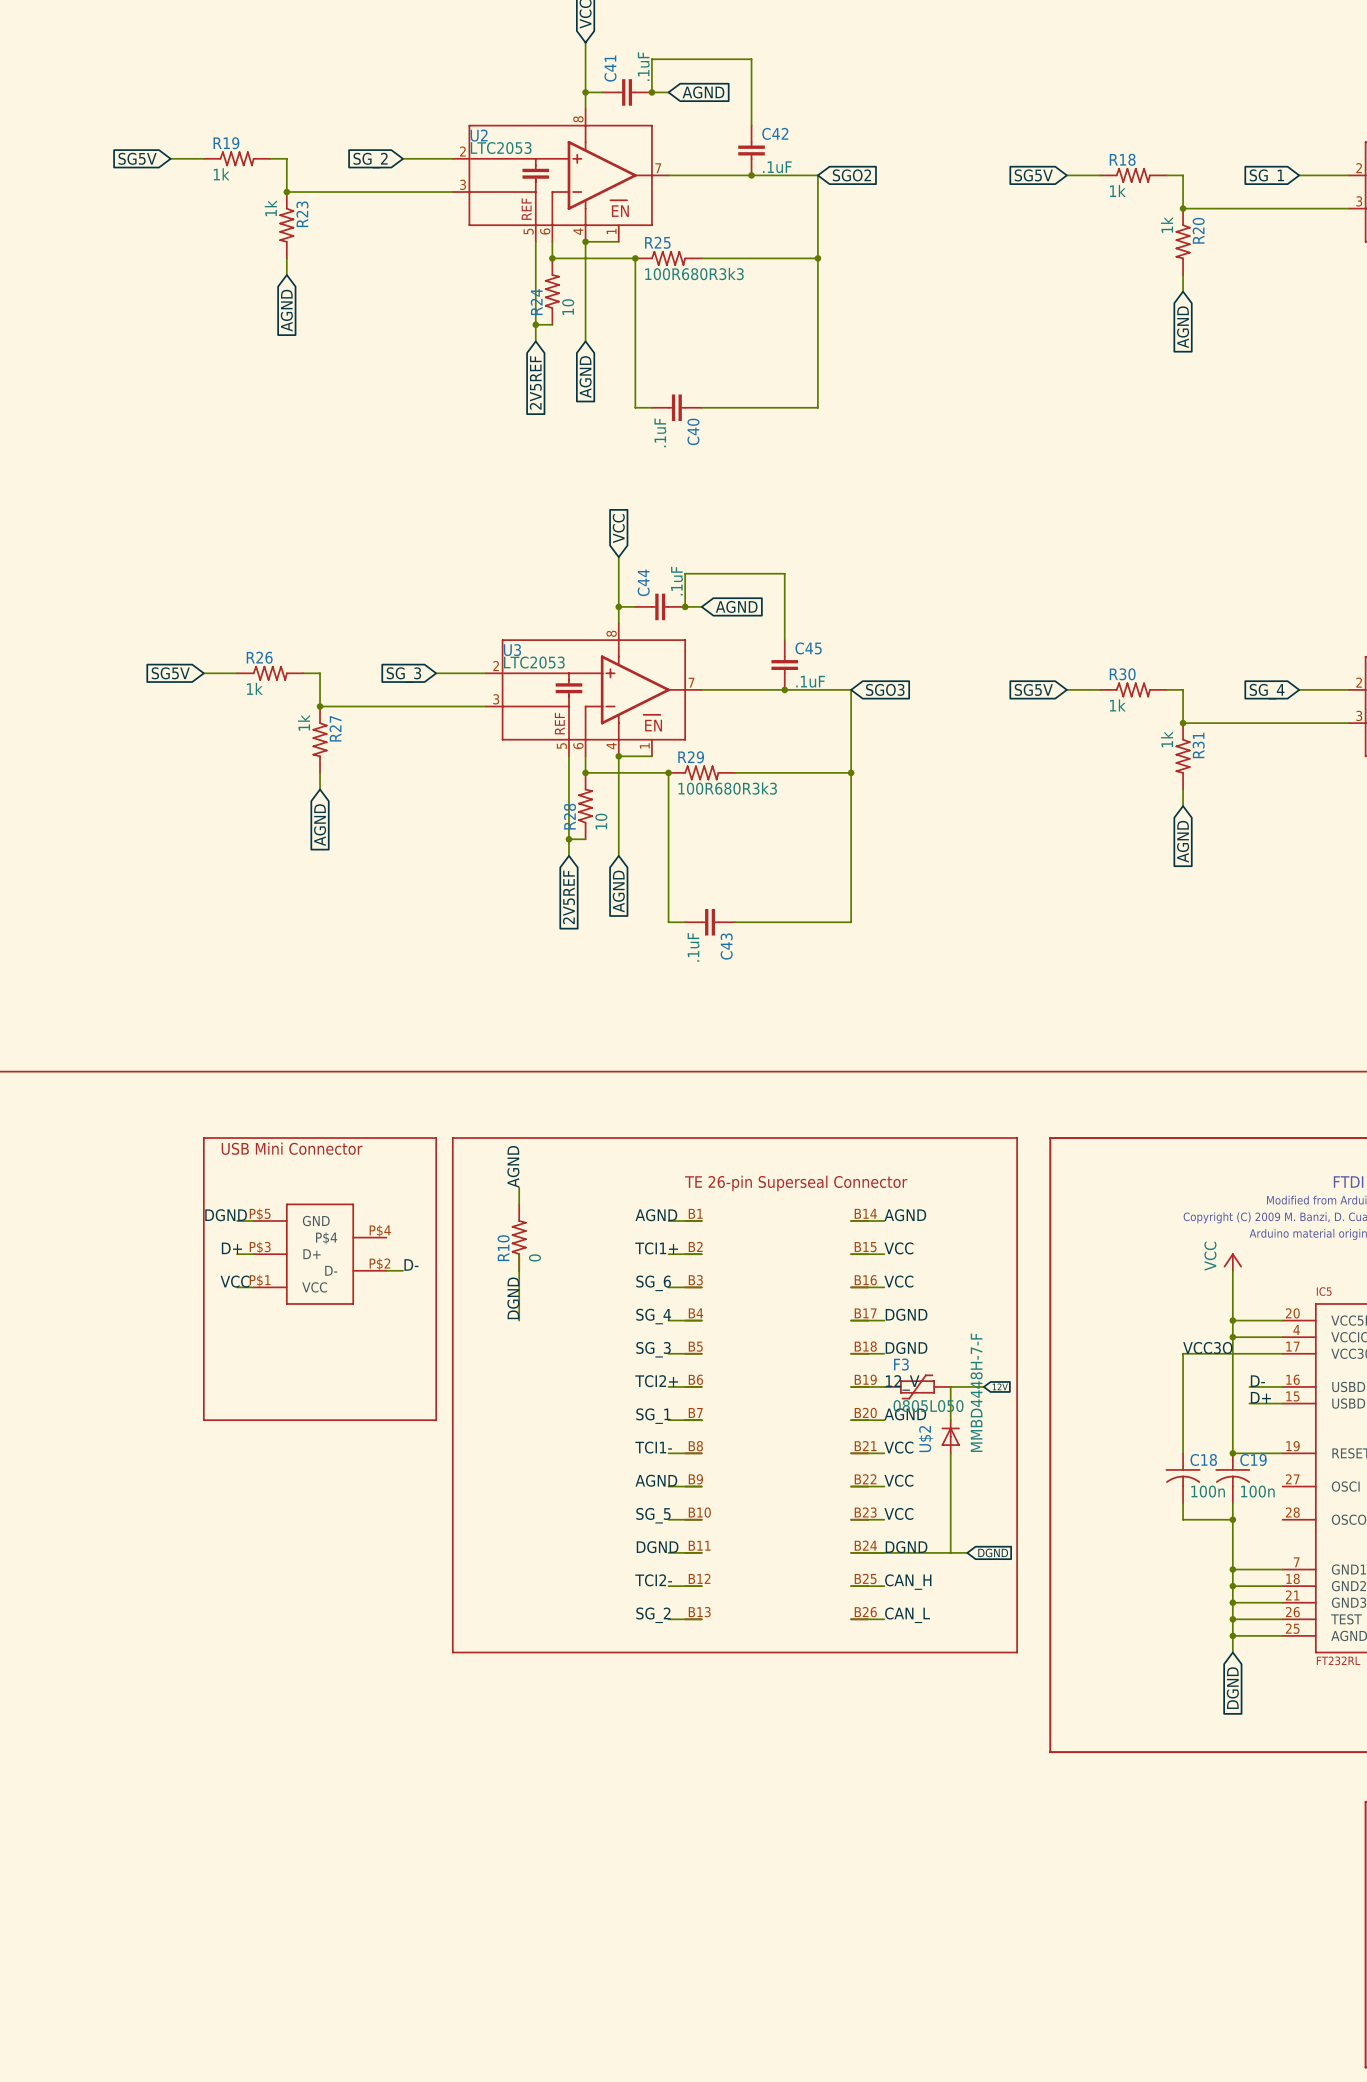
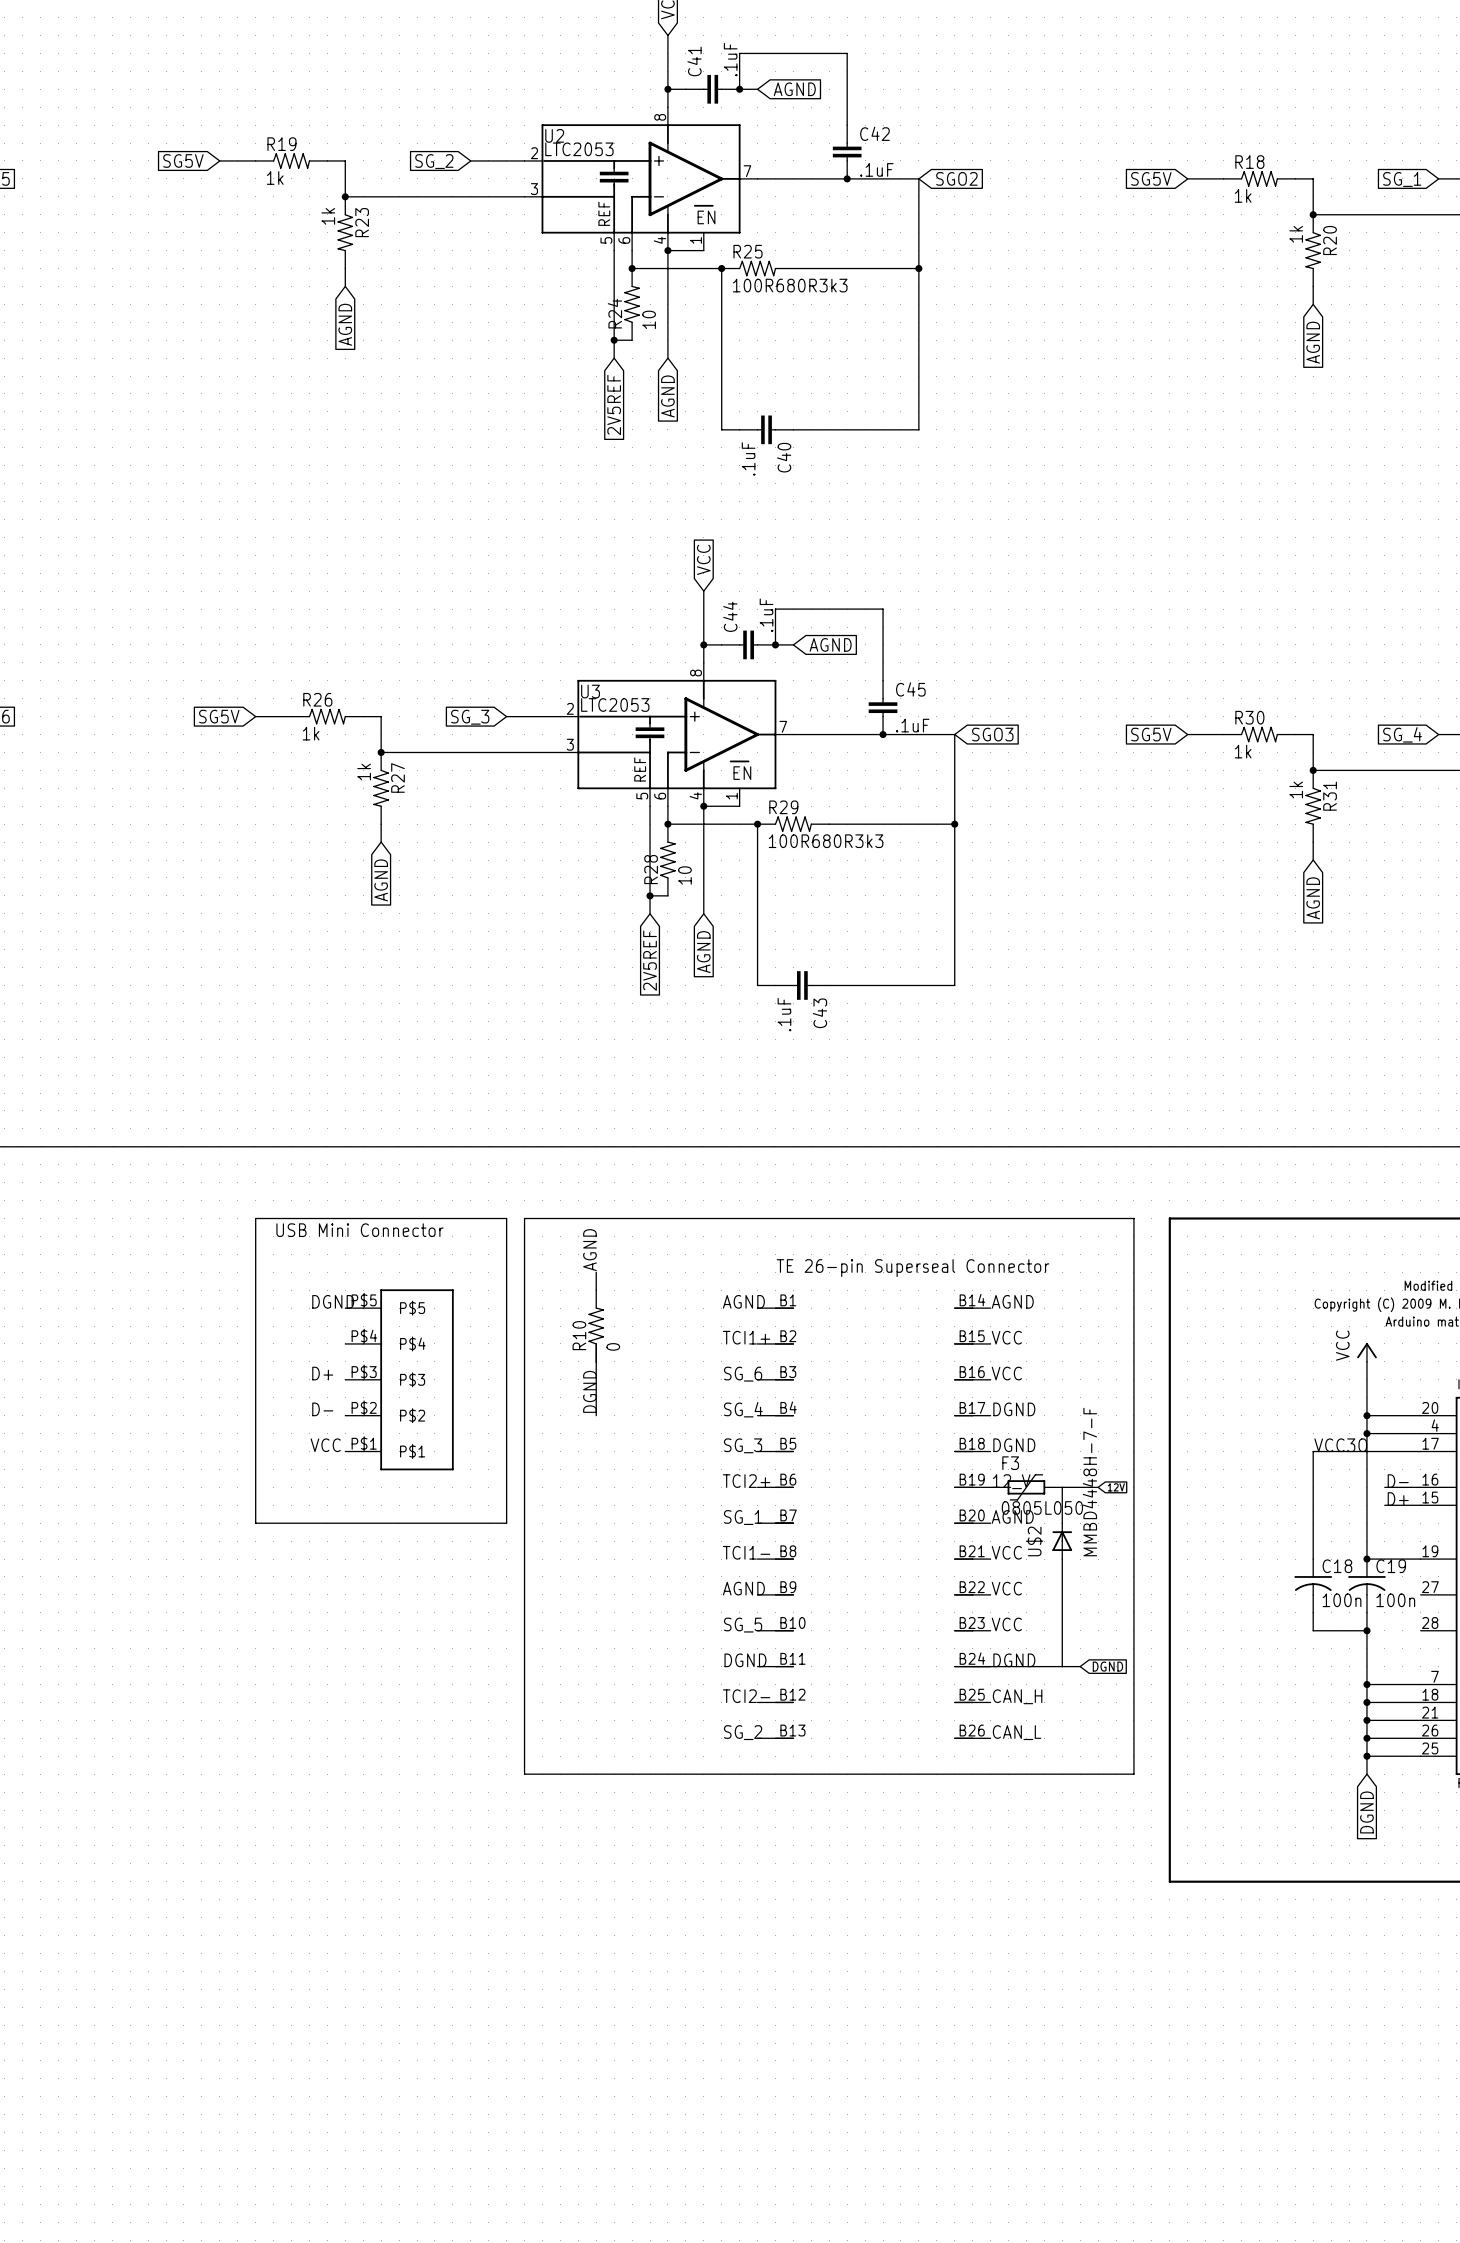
label position: DGND (226, 1215) -> DGND (333, 1301)
wire: (237, 1221) (253, 1221) -> (345, 1308) (363, 1308)
label position: D+ (231, 1248) -> D+ (322, 1373)
wire: (237, 1254) (253, 1254) -> (345, 1343) (363, 1343)
part: (320, 1254) -> none
label position: D- (411, 1264) -> D- (322, 1409)
wire: (386, 1270) (403, 1270) -> (345, 1415) (363, 1415)
label position: VCC (235, 1281) -> VCC (325, 1445)
wire: (237, 1287) (253, 1287) -> (345, 1379) (363, 1379)
part: none -> (408, 1379)
wire: none -> (345, 1451) (363, 1451)

